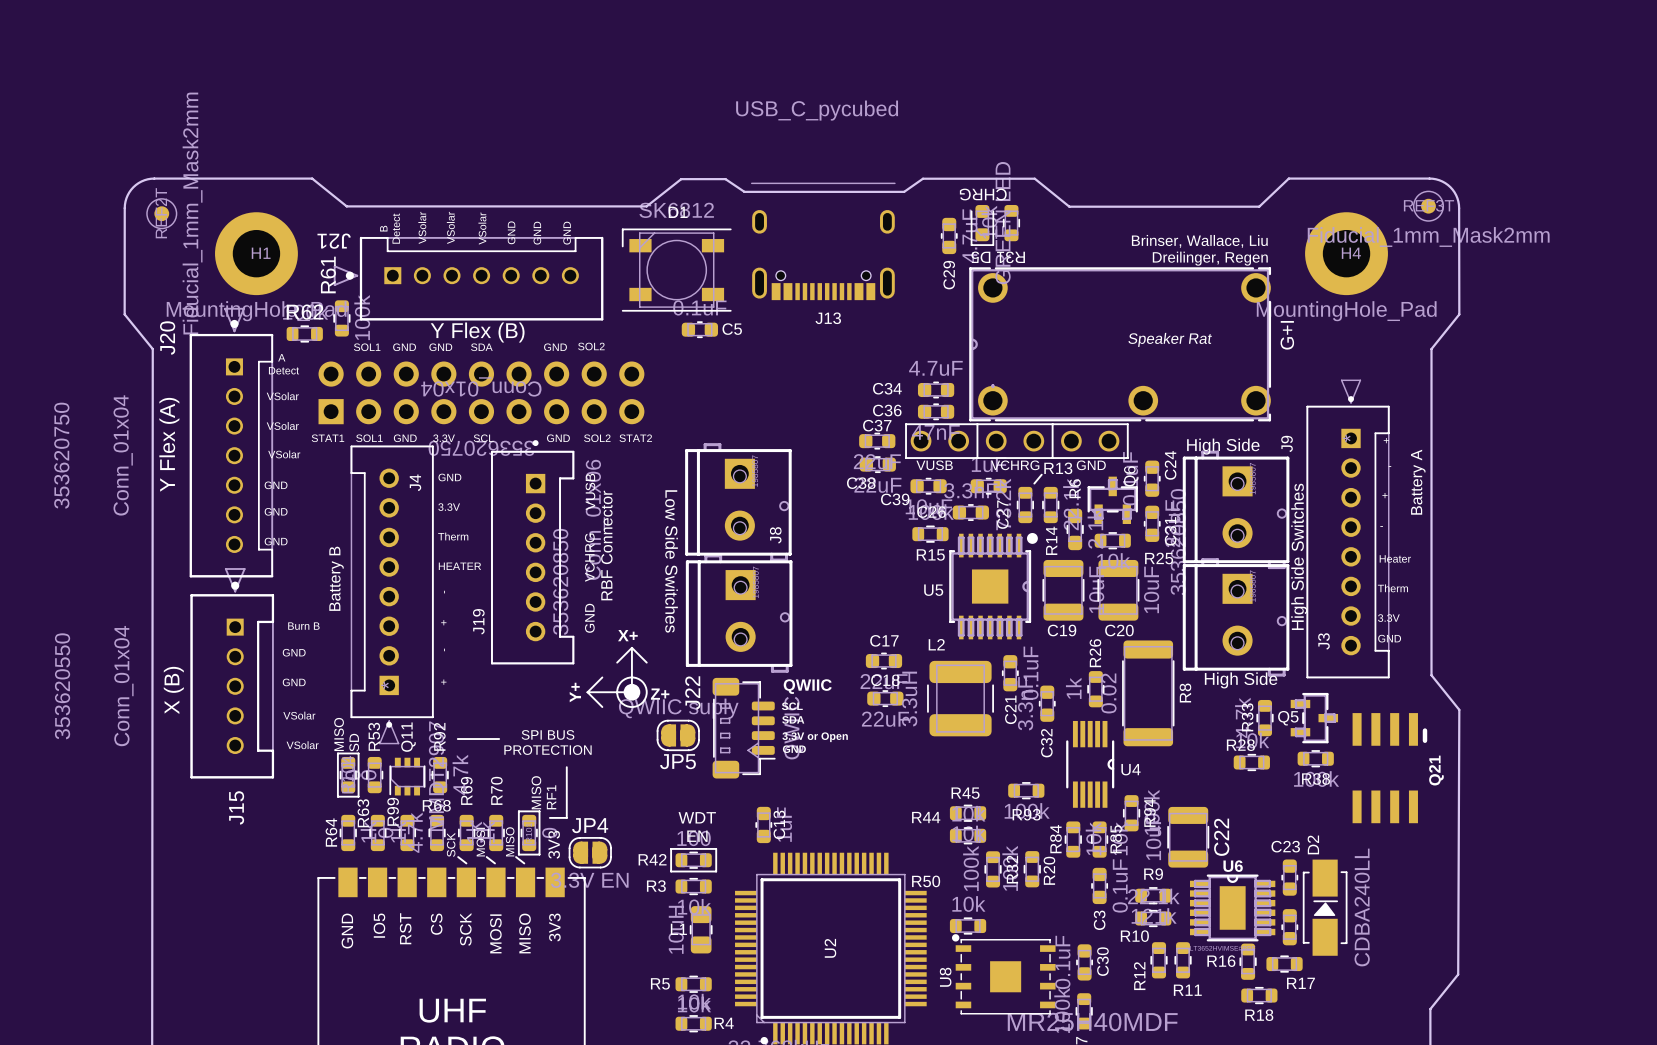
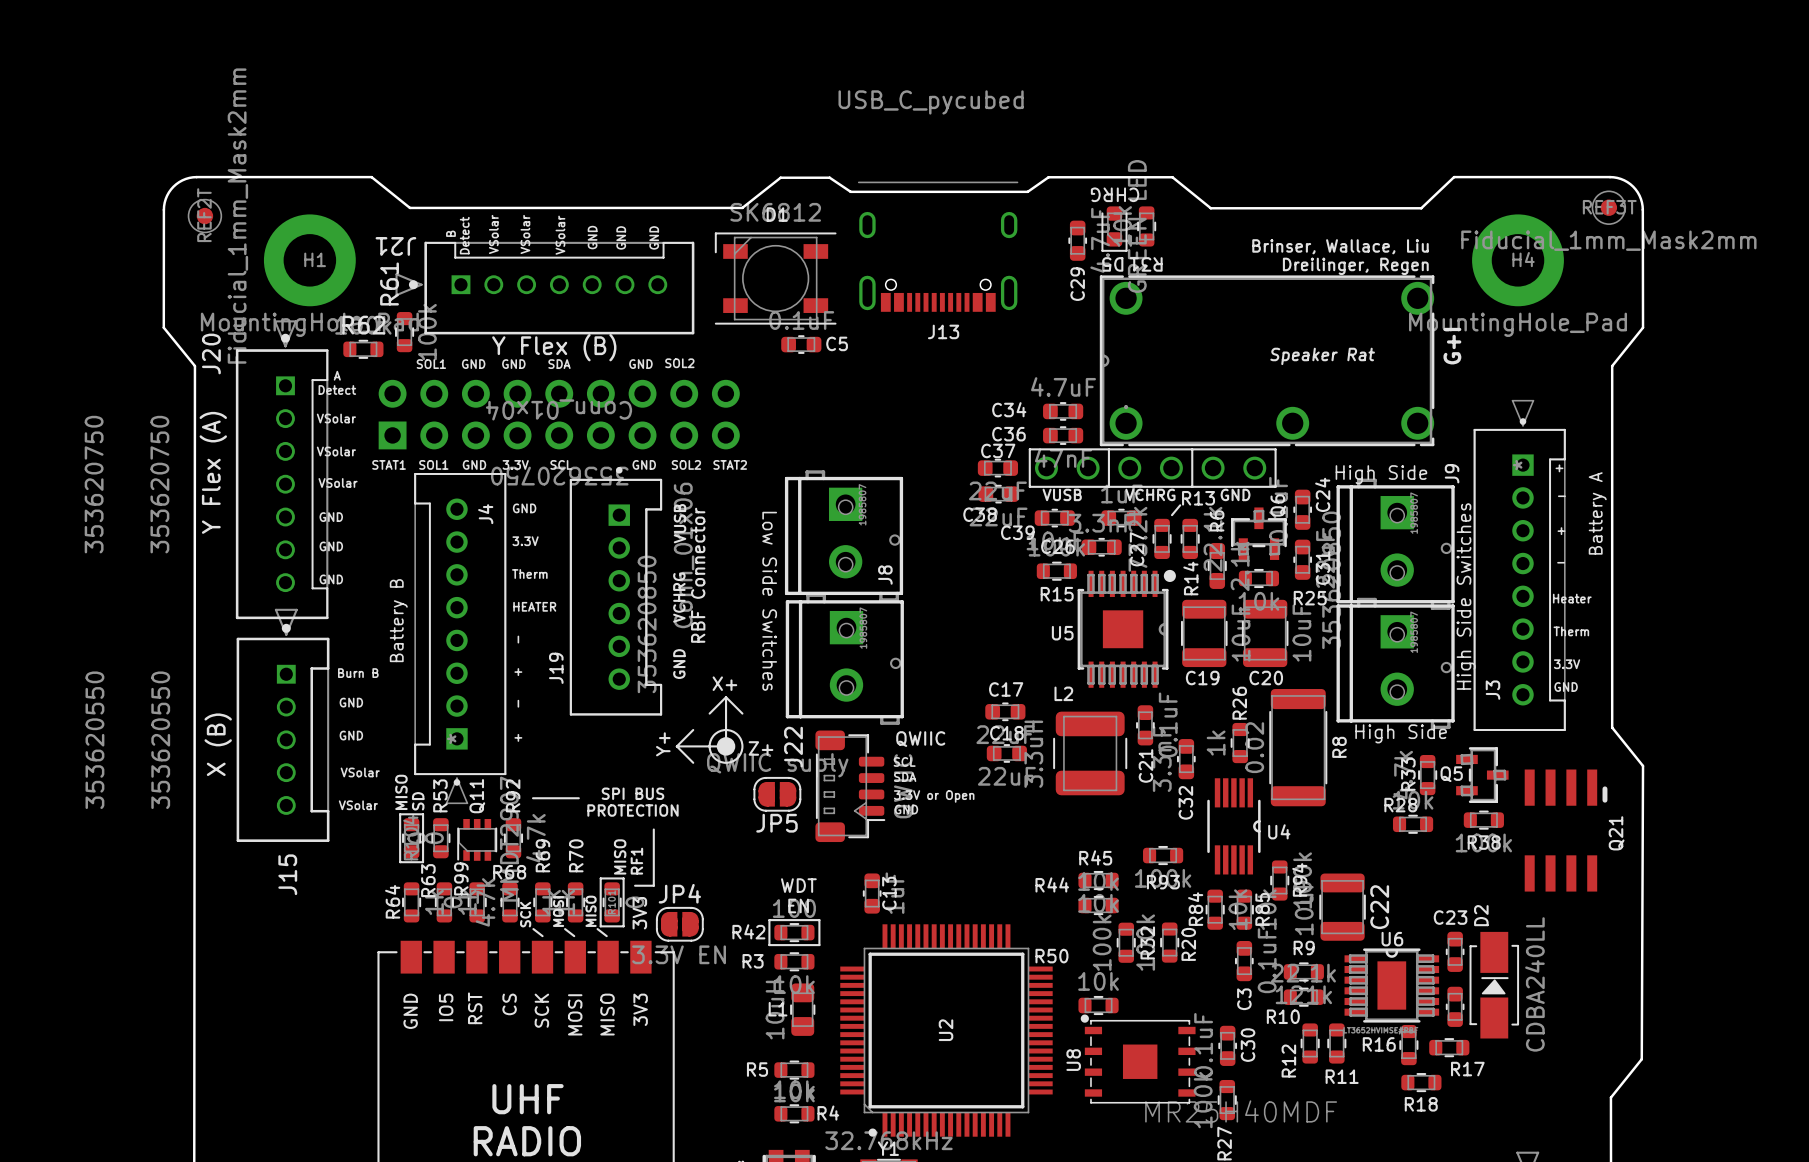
J20 value: Conn_01x04 (123, 455) -> 353620750 (159, 484)
J15 value: Conn_01x04 (123, 686) -> 353620550 (160, 740)

